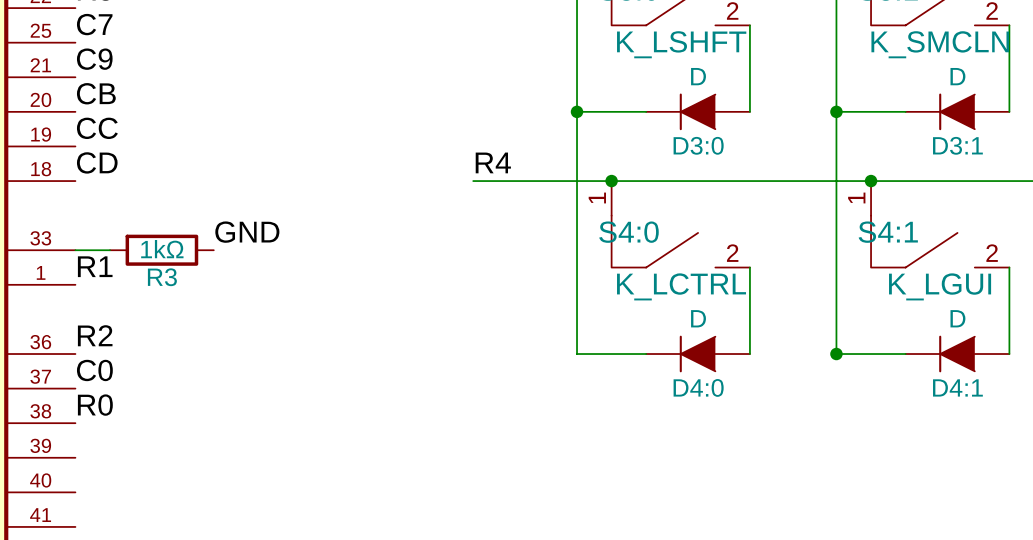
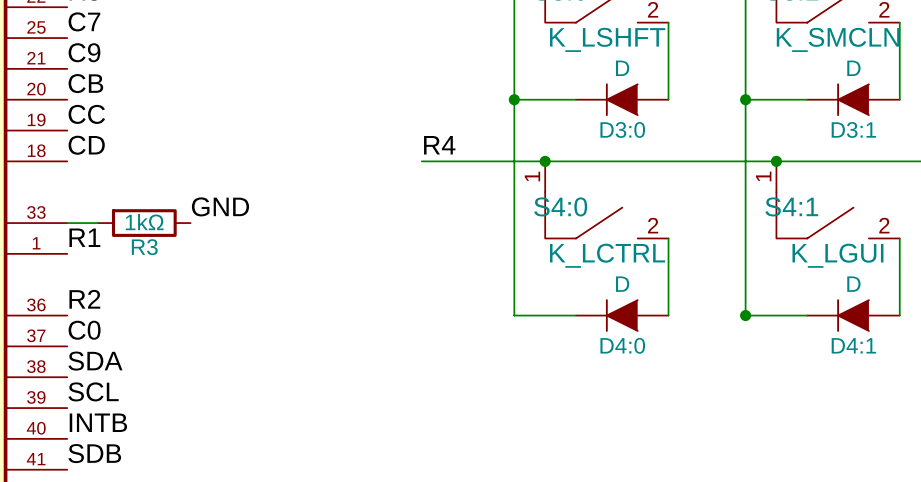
label: R0 (95, 405) -> SDA (95, 361)
label: none -> SCL (93, 391)
label: none -> INTB (98, 422)
label: none -> SDB (94, 453)

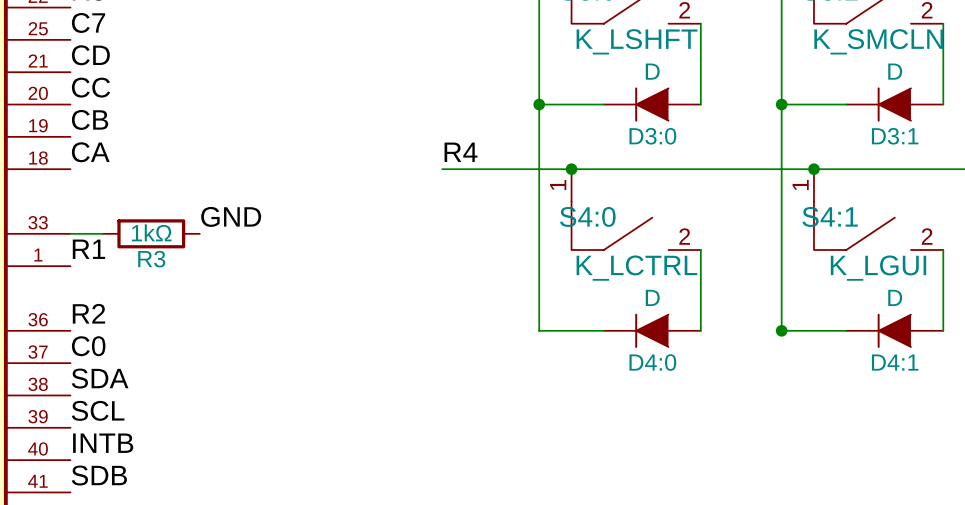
label: C9 (84, 52) -> CD (90, 55)
label: CB (85, 83) -> CC (91, 87)
label: CC (86, 114) -> CB (90, 119)
label: CD (86, 145) -> CA (90, 152)

